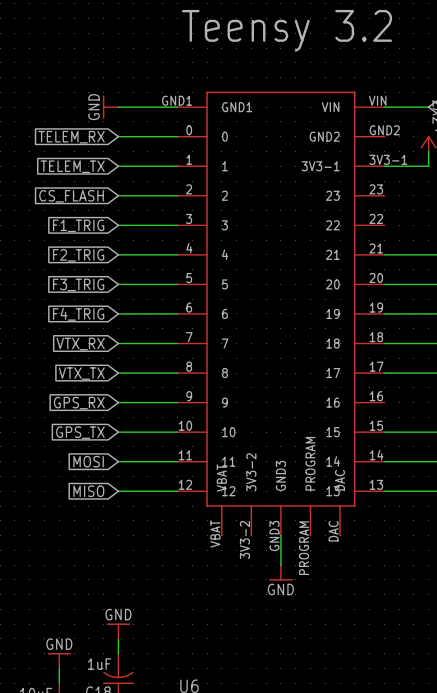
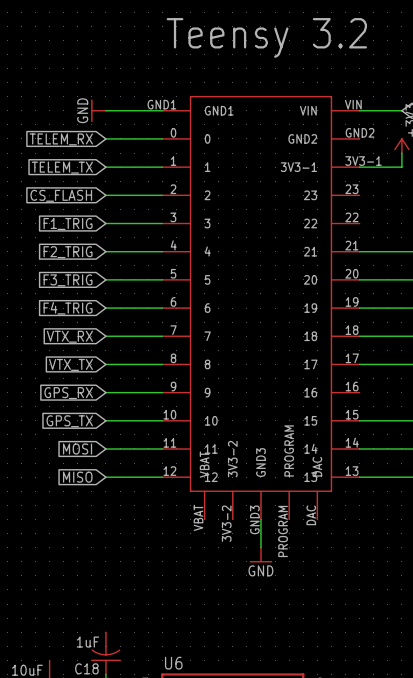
power symbol: GND (118, 631) -> none
wire: (118, 638) (118, 653) -> none
power symbol: GND (59, 660) -> none
wire: (59, 668) (59, 683) -> none

